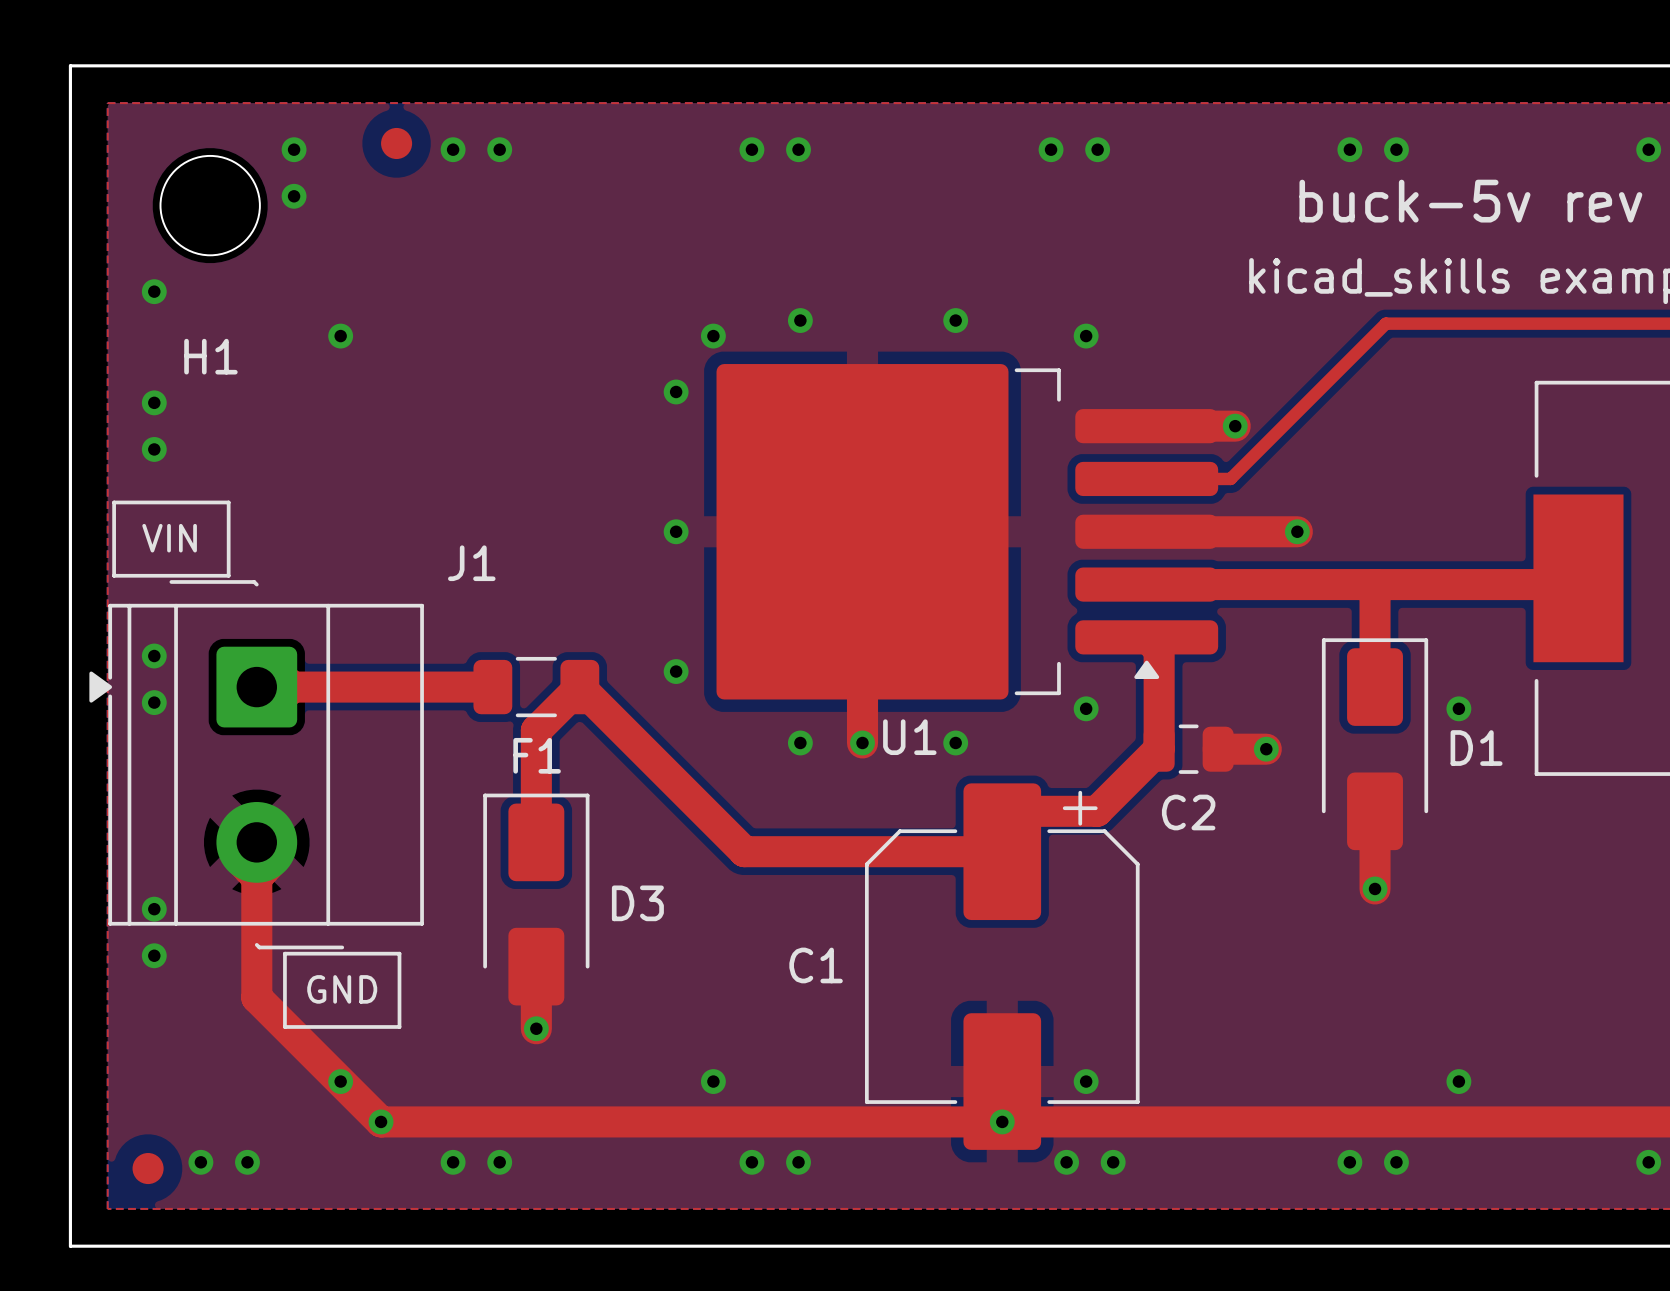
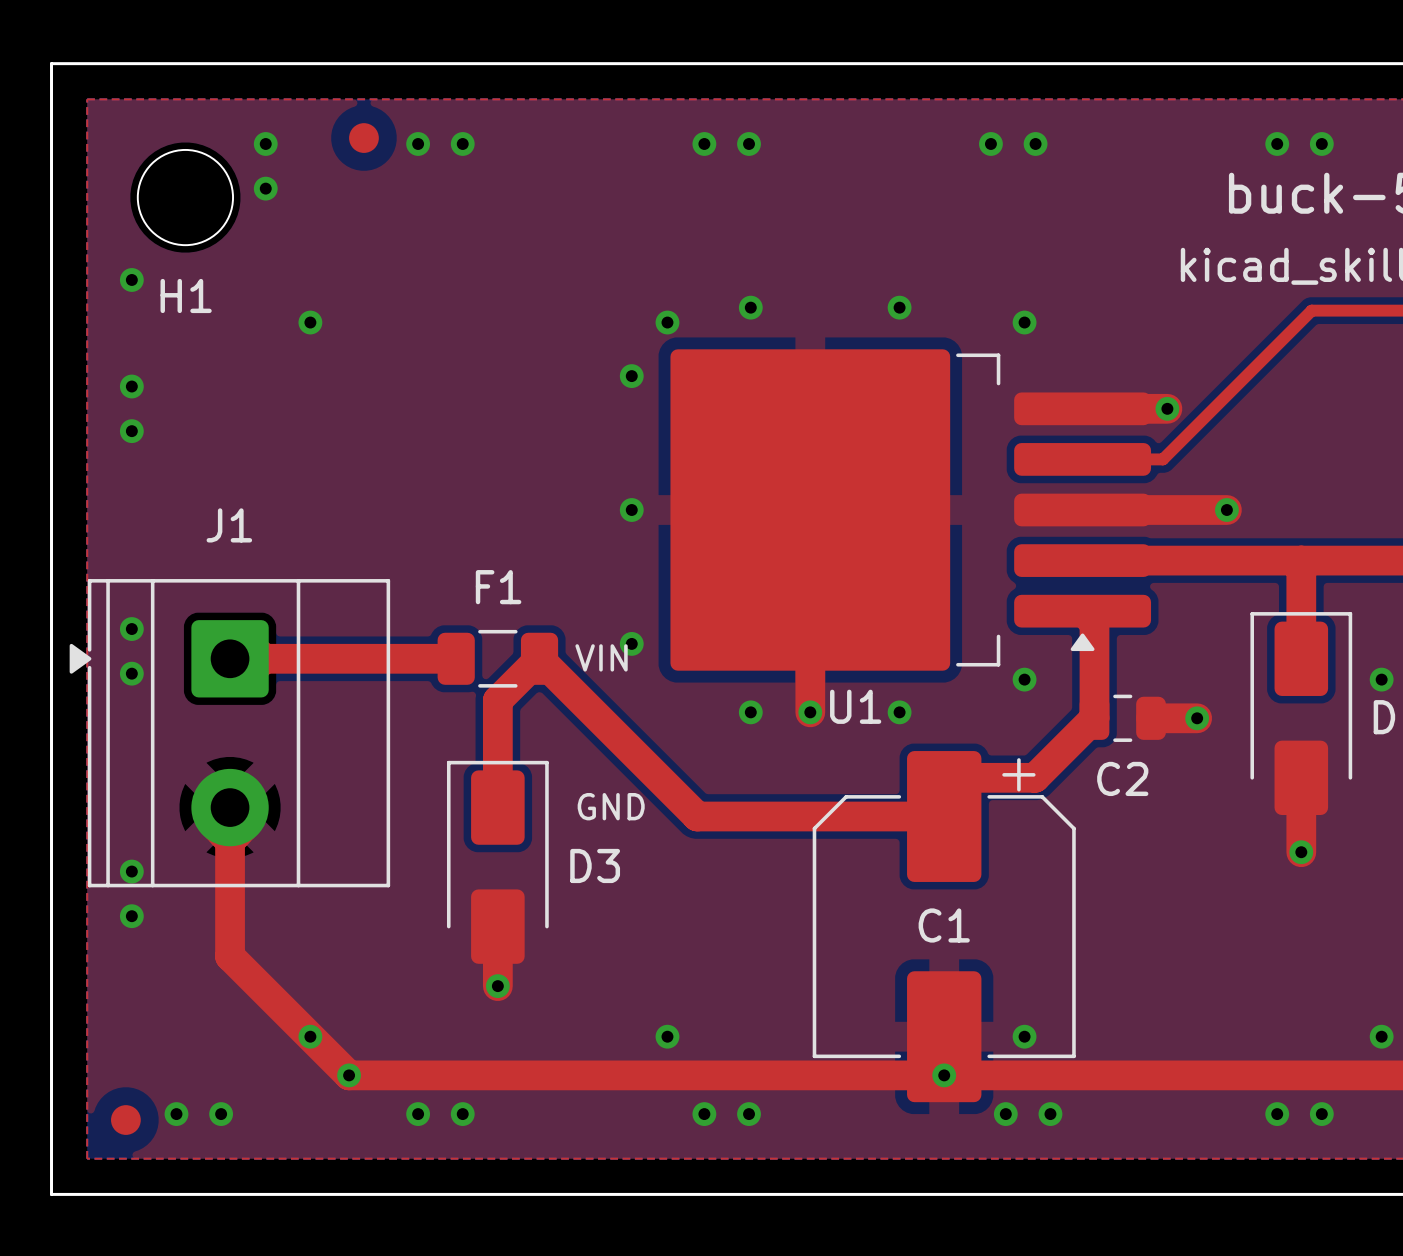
H1 name position: H1 (210, 356) -> H1 (186, 295)
line: (114, 502) (228, 502) (228, 575) (114, 575) (114, 502) -> none
text position: VIN (169, 538) -> VIN (601, 657)
J1 name position: J1 (471, 563) -> J1 (229, 525)
line: (171, 581) (254, 581) (256, 584) -> none
F1 name position: F1 (537, 755) -> F1 (498, 587)
line: (256, 944) (259, 947) (342, 947) -> none
line: (284, 953) (399, 953) (399, 1026) (284, 1026) (284, 953) -> none
C1 name position: C1 (816, 965) -> C1 (944, 925)
text position: GND (342, 989) -> GND (611, 806)

